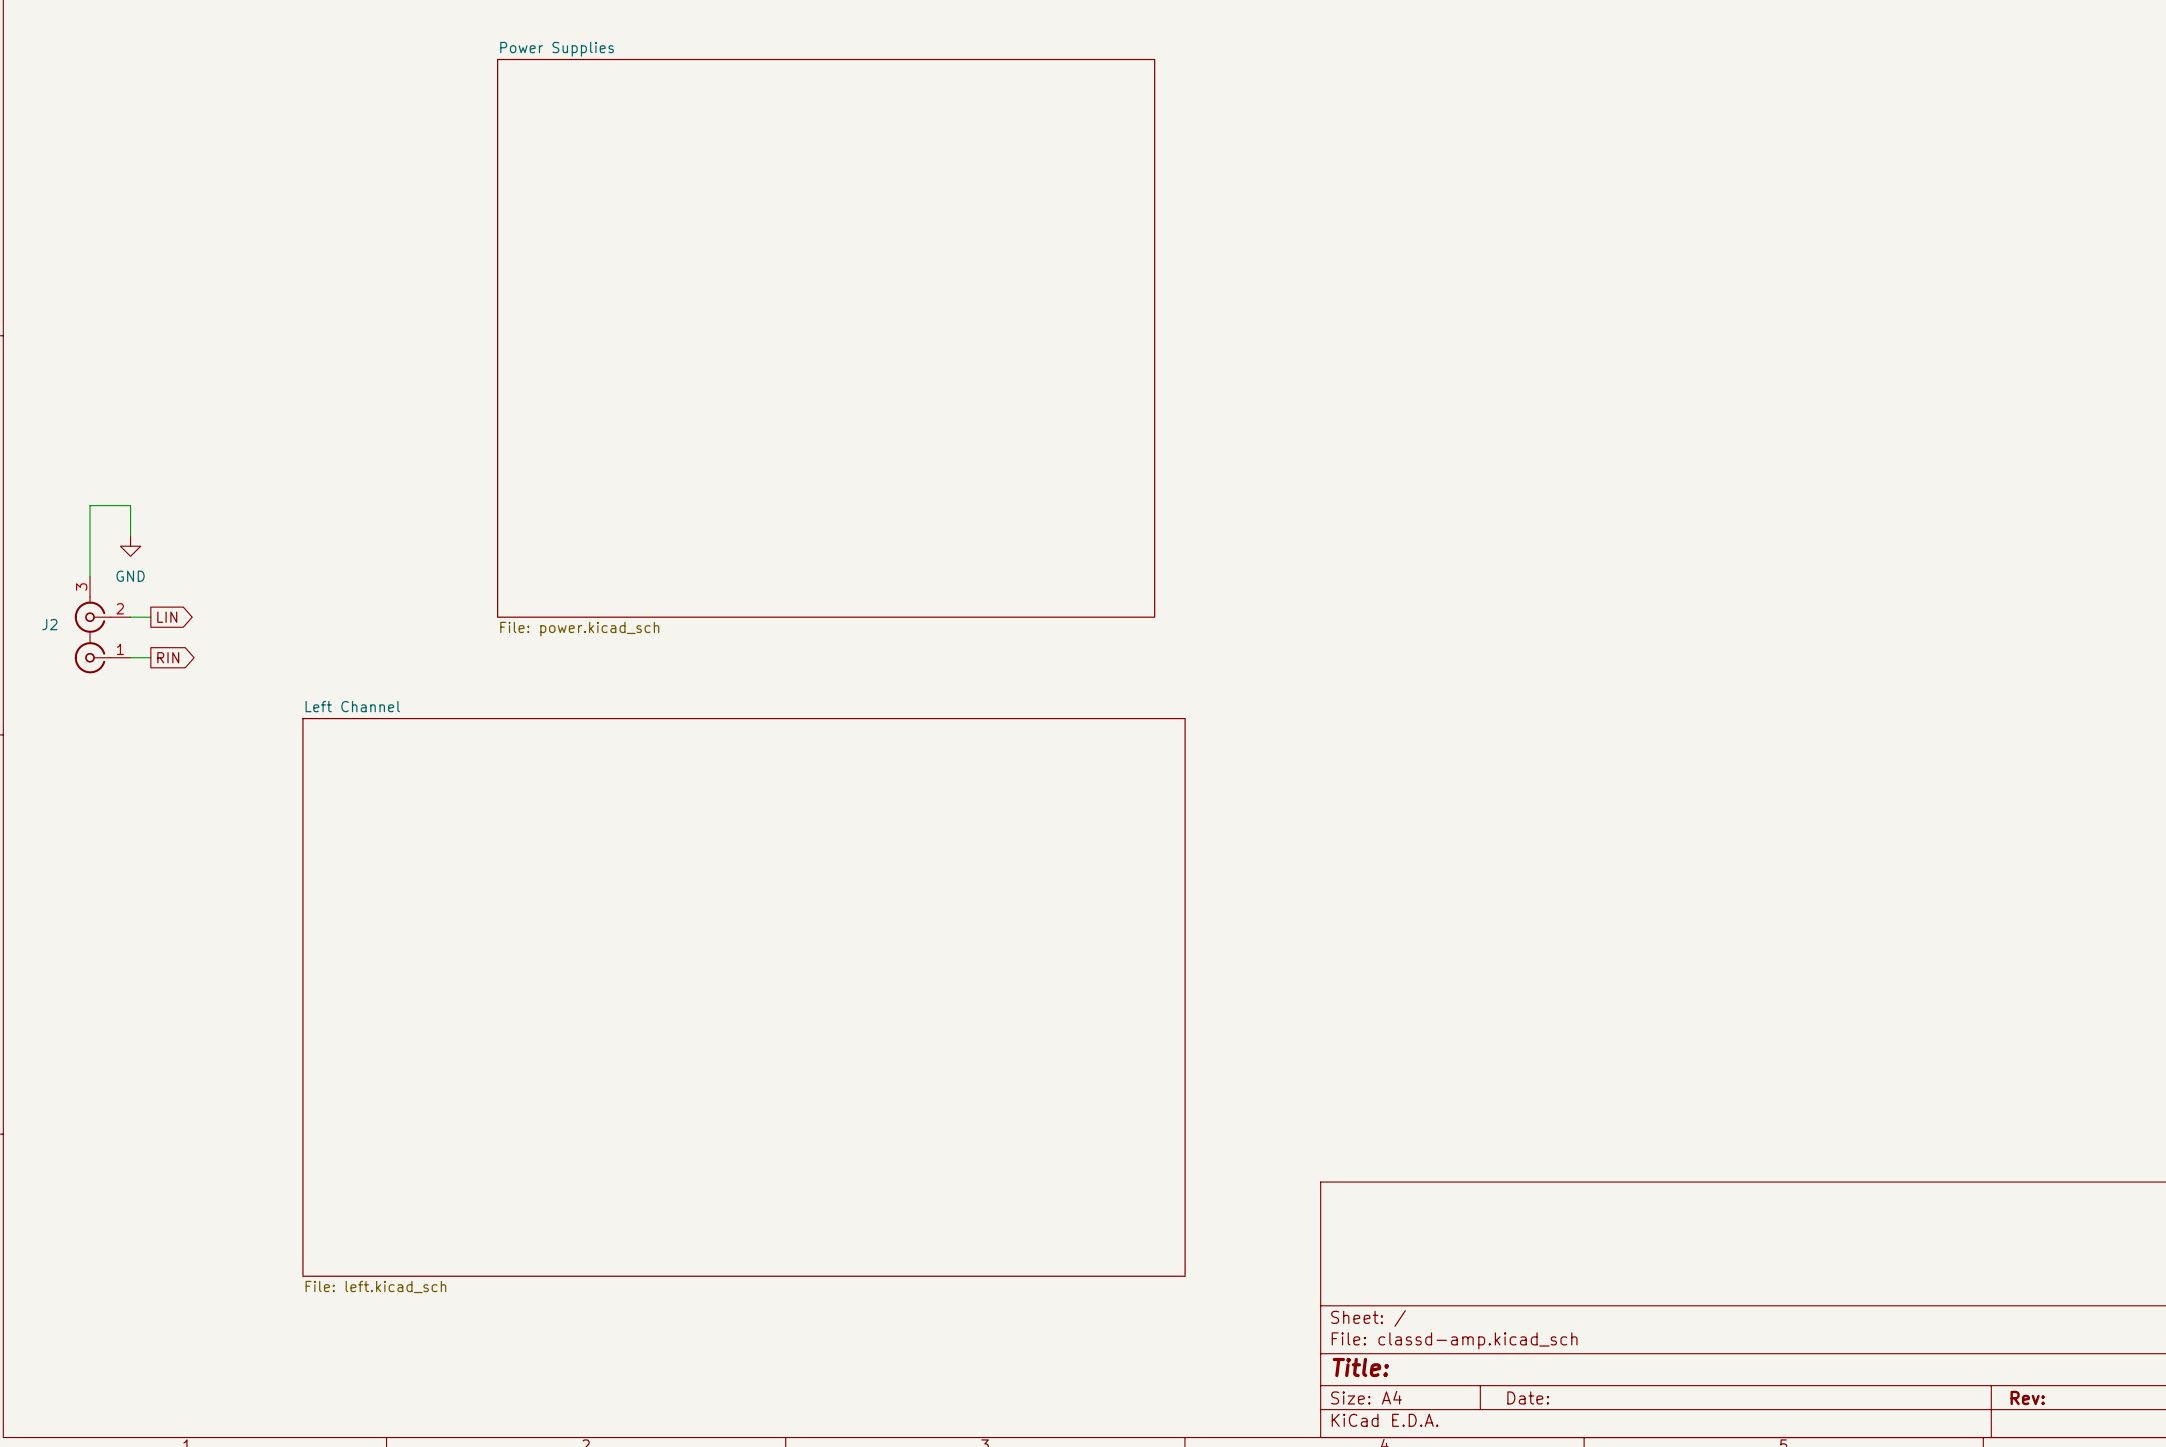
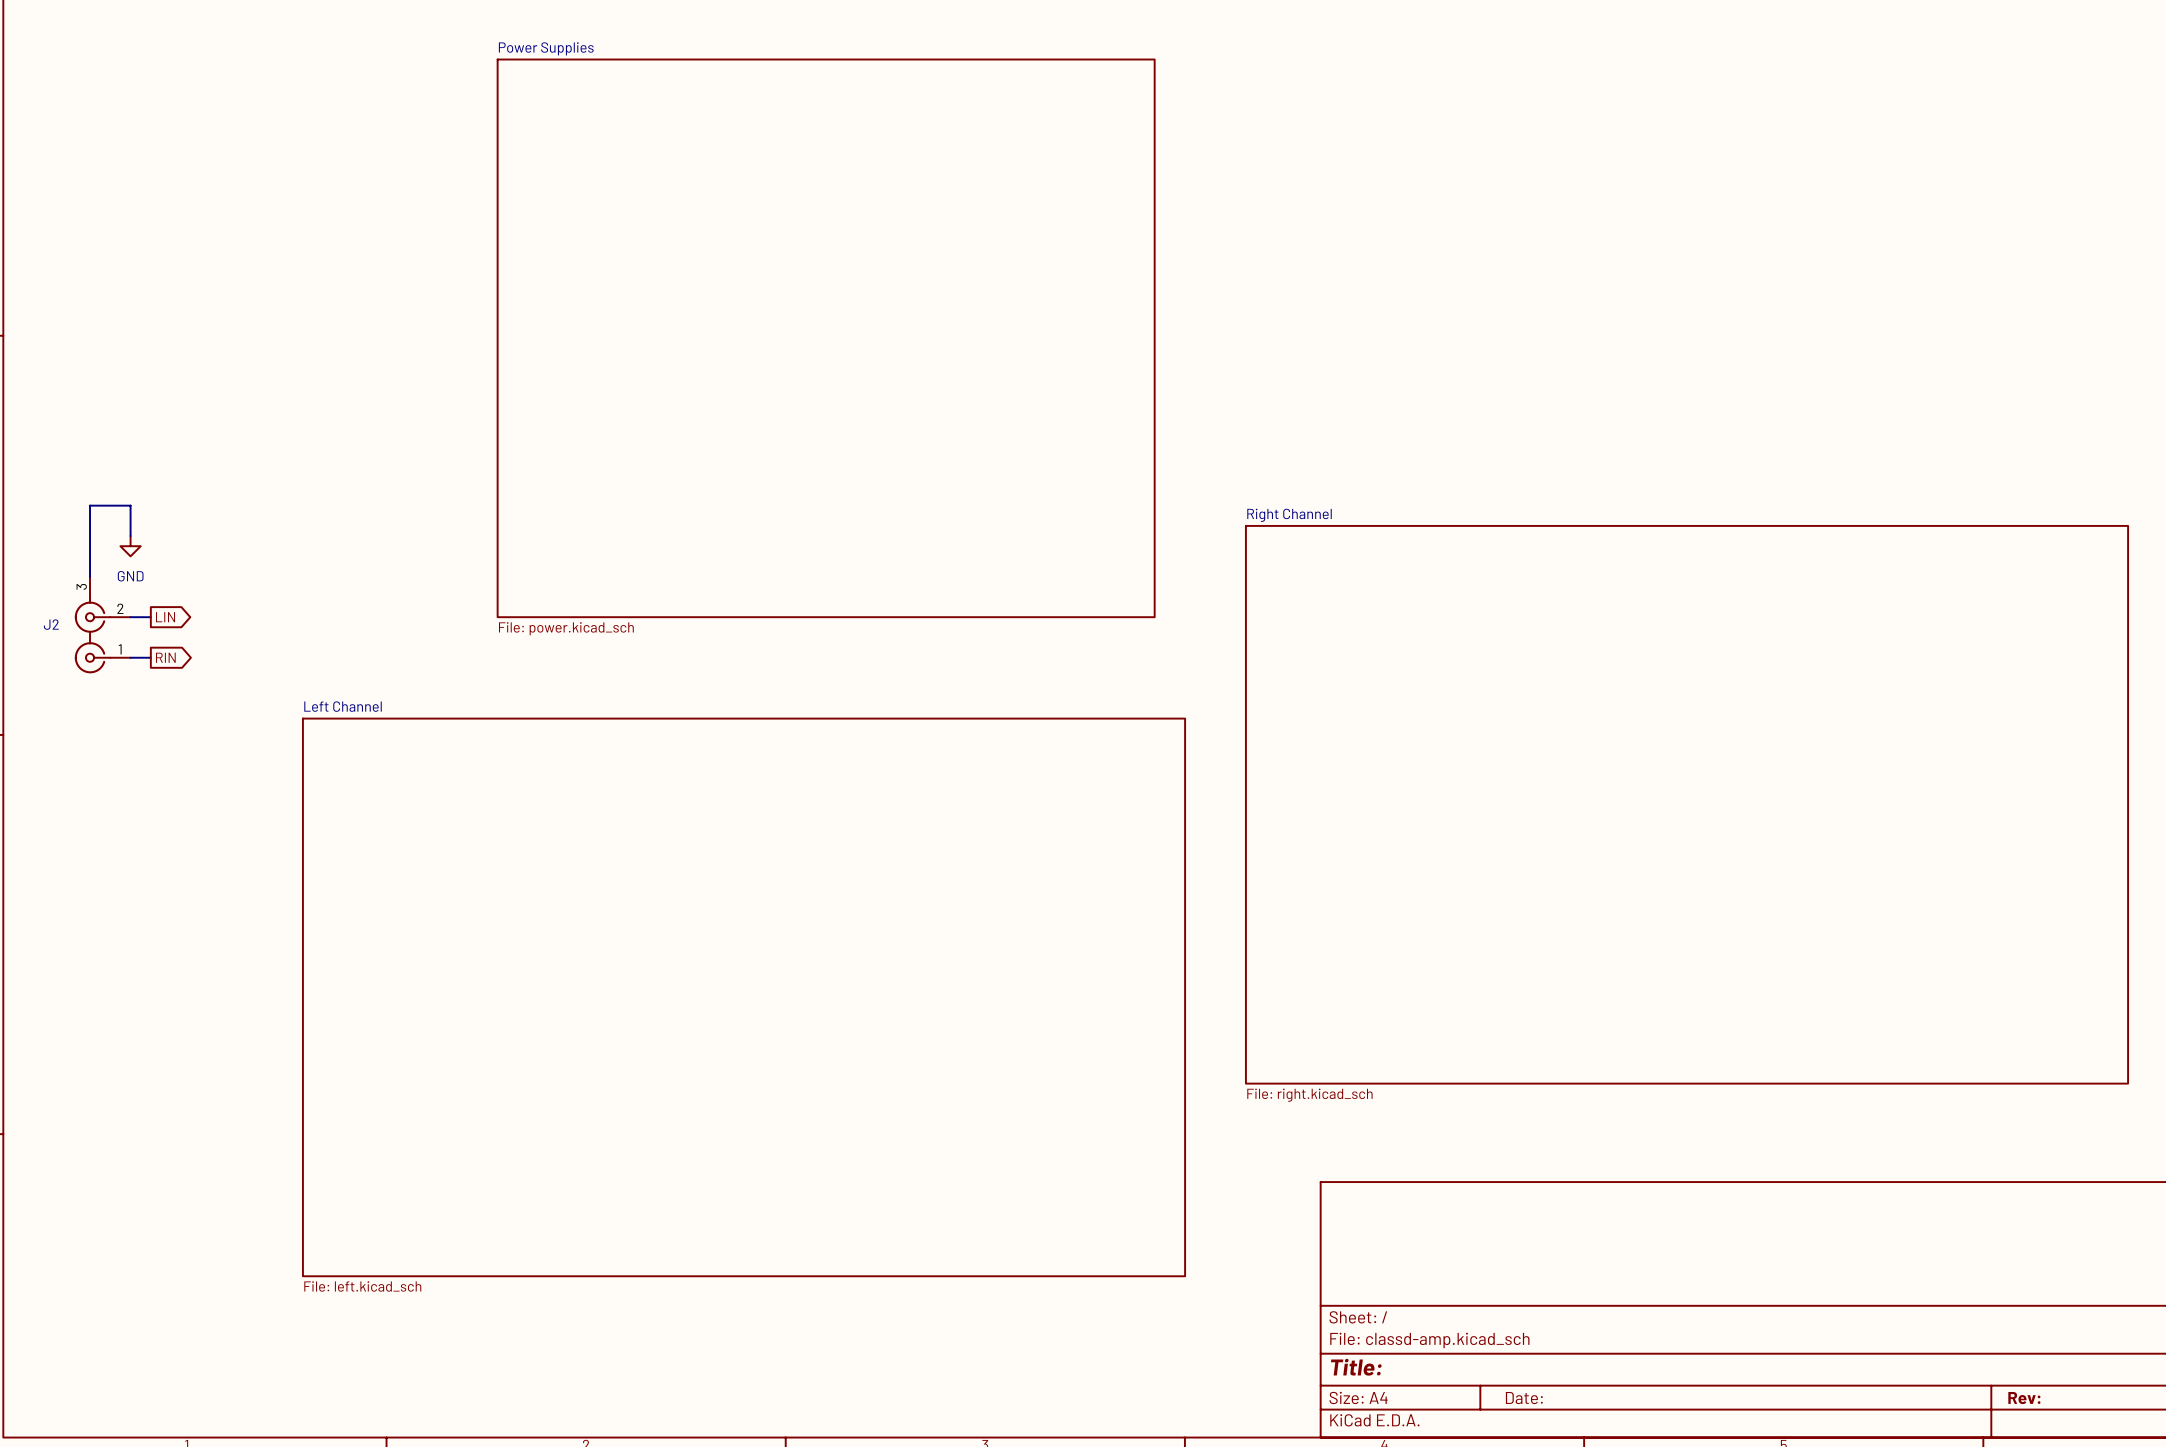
sheet Right Channel: none -> File: right.kicad_sch (1687, 804)

